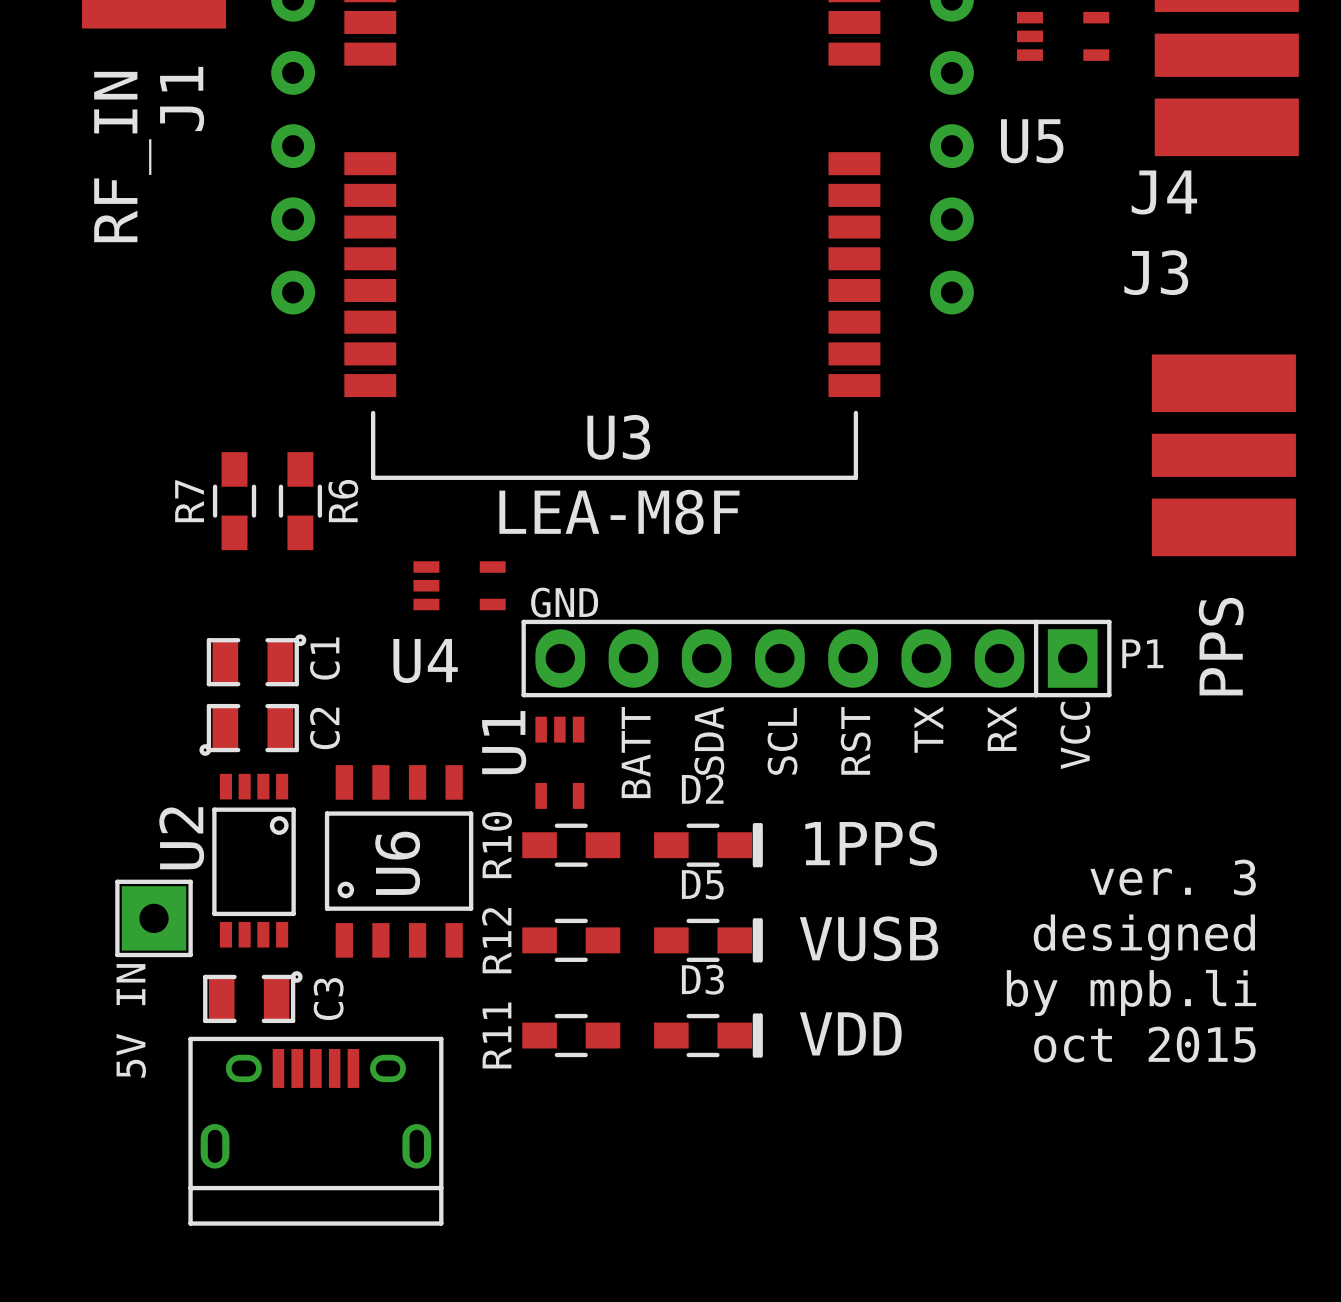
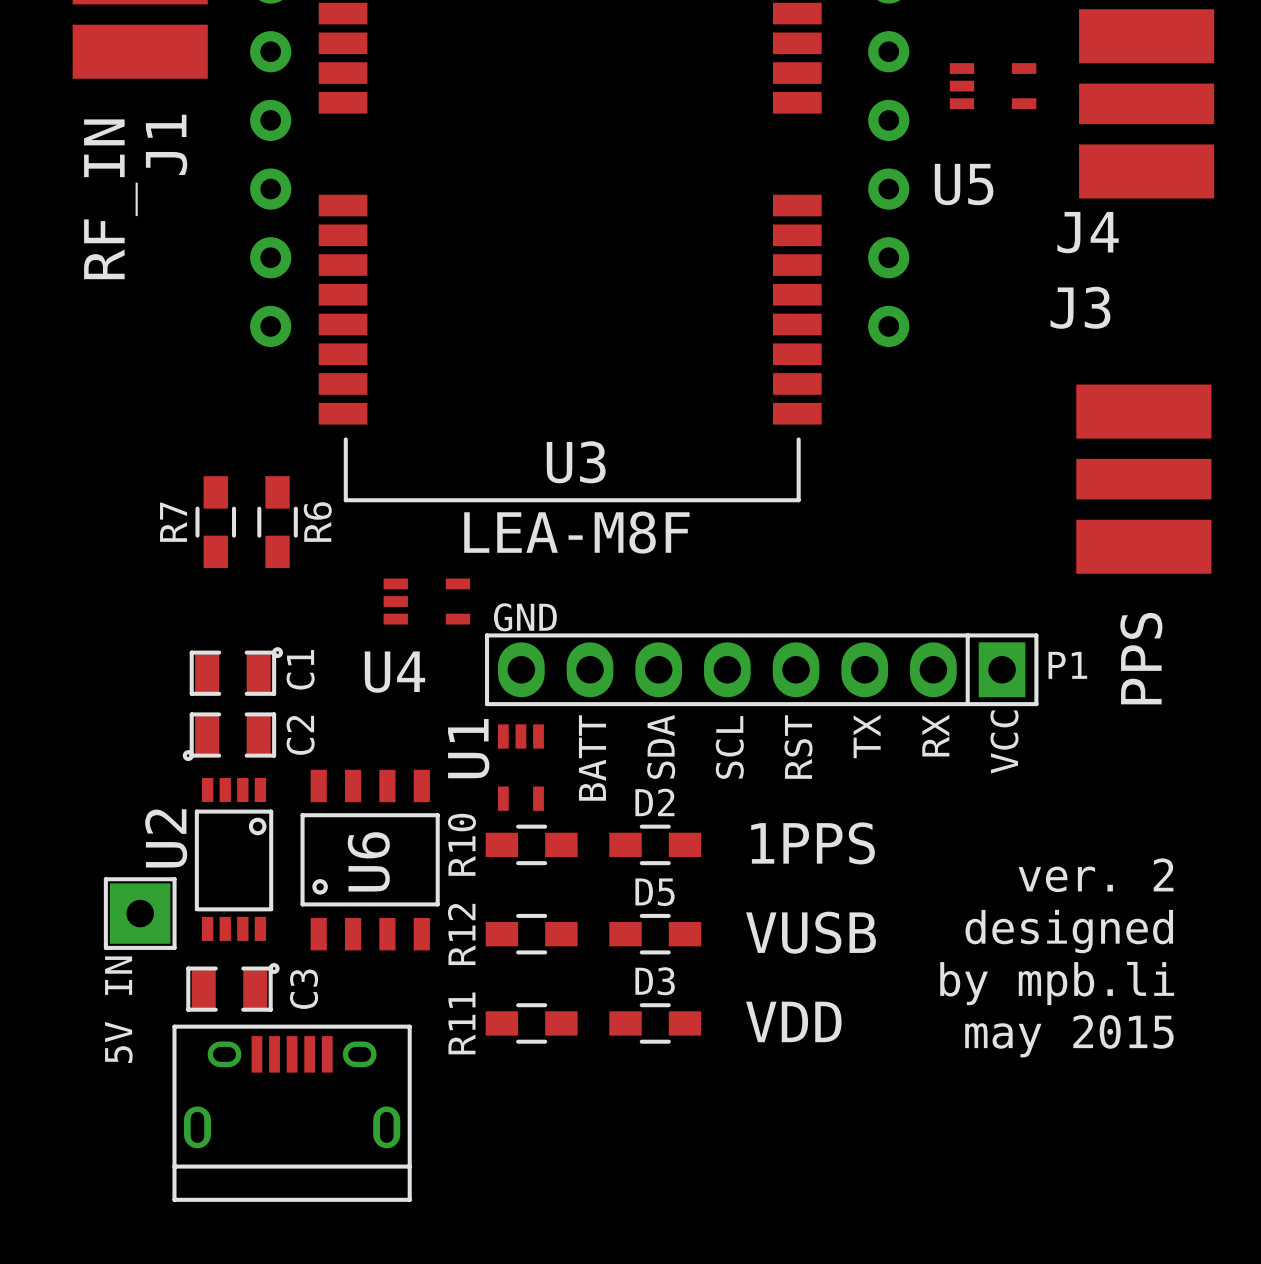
D2 footprint: [654, 822, 763, 868] -> [609, 824, 702, 866]
text: ver. 3 (1173, 877) -> ver. 2 (1096, 875)
D5 footprint: [654, 918, 763, 963] -> [609, 913, 702, 955]
D3 footprint: [654, 1013, 763, 1058] -> [609, 1003, 702, 1044]
text: oct 2015 (1144, 1044) -> may 2015 (1069, 1036)

